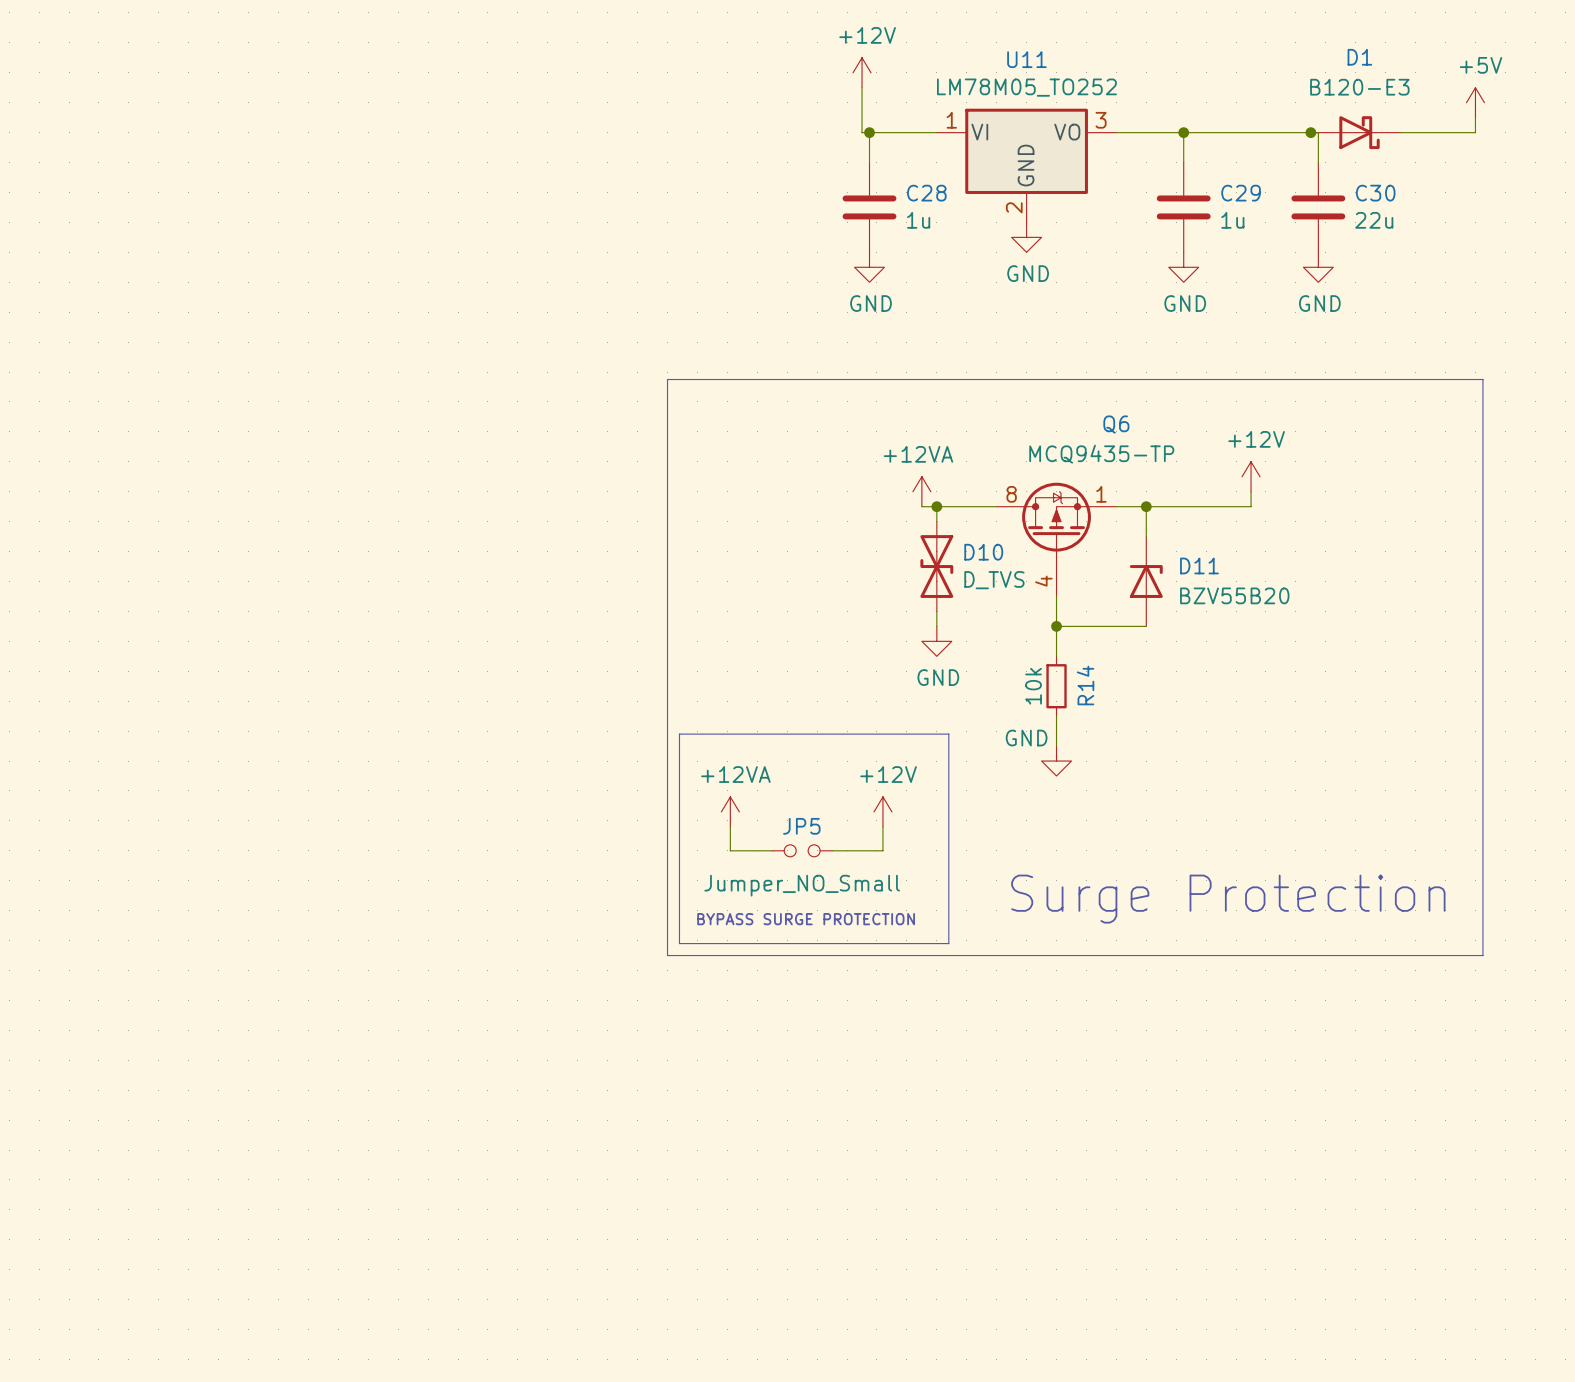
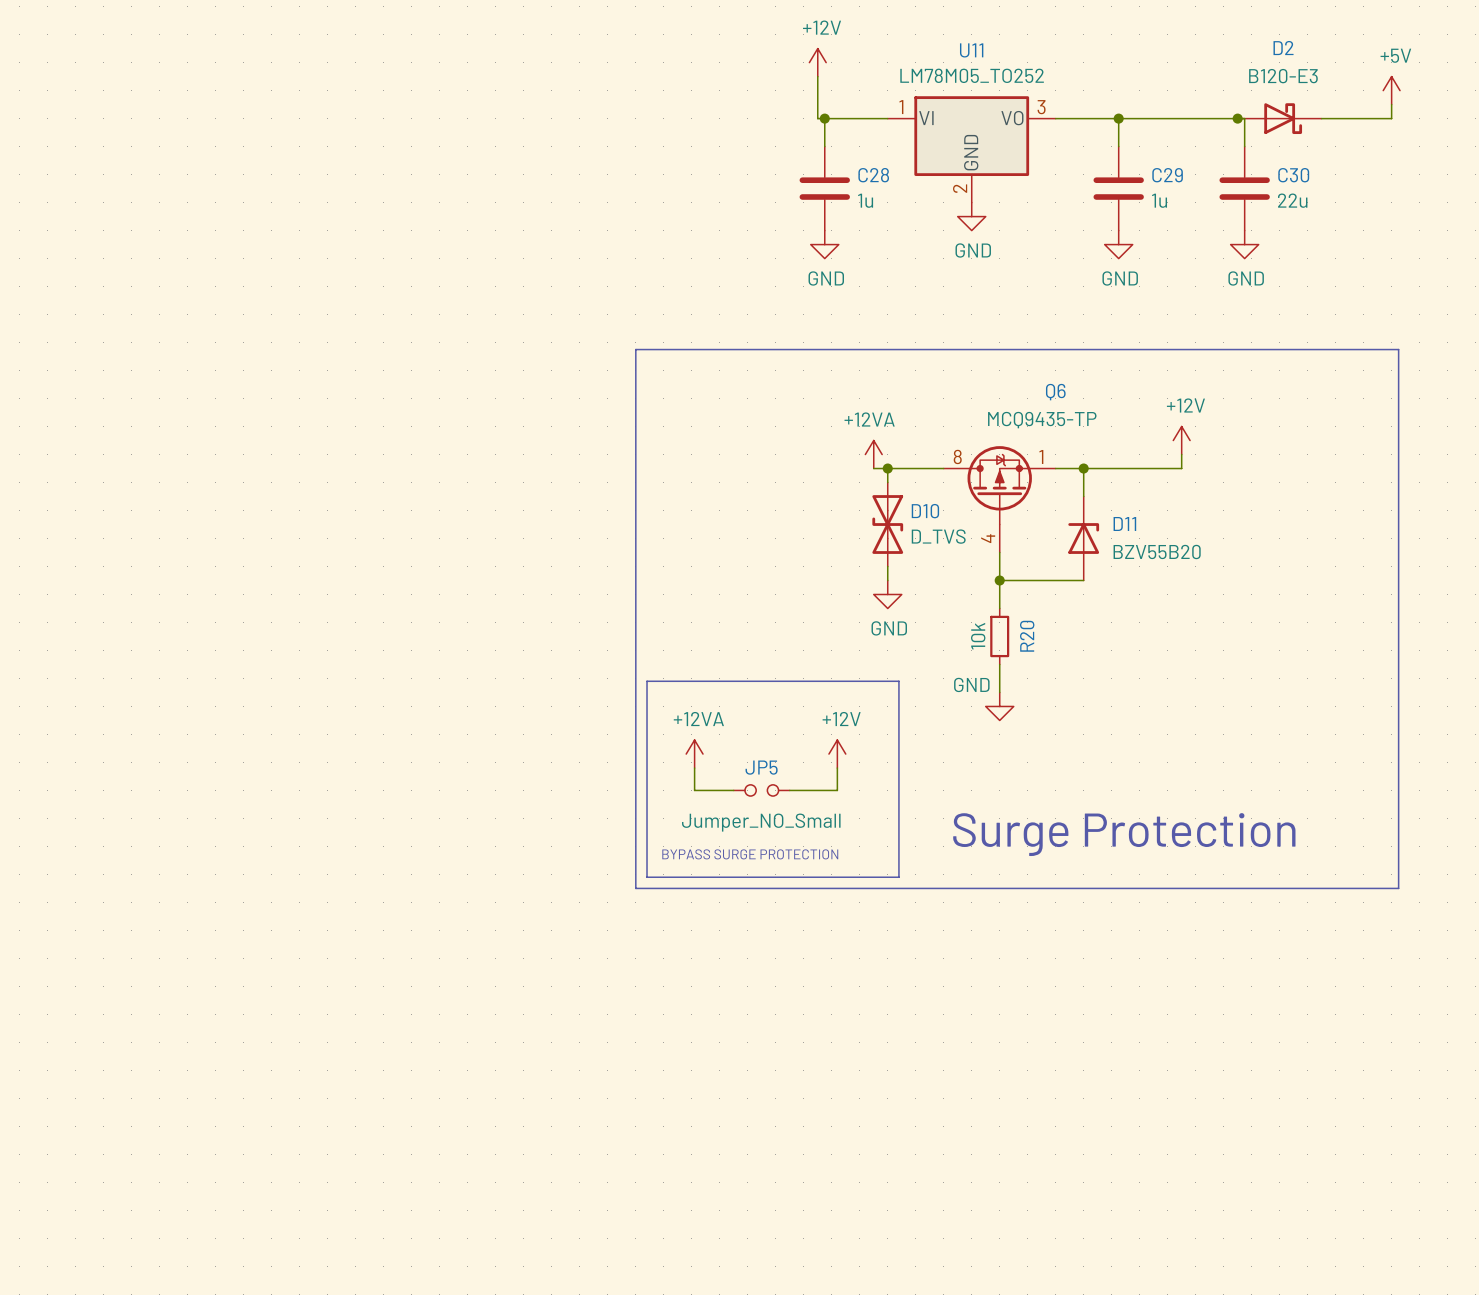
D1 name: D1 (1359, 57) -> D2 (1283, 48)
R14 name: R14 (1085, 685) -> R20 (1027, 636)

